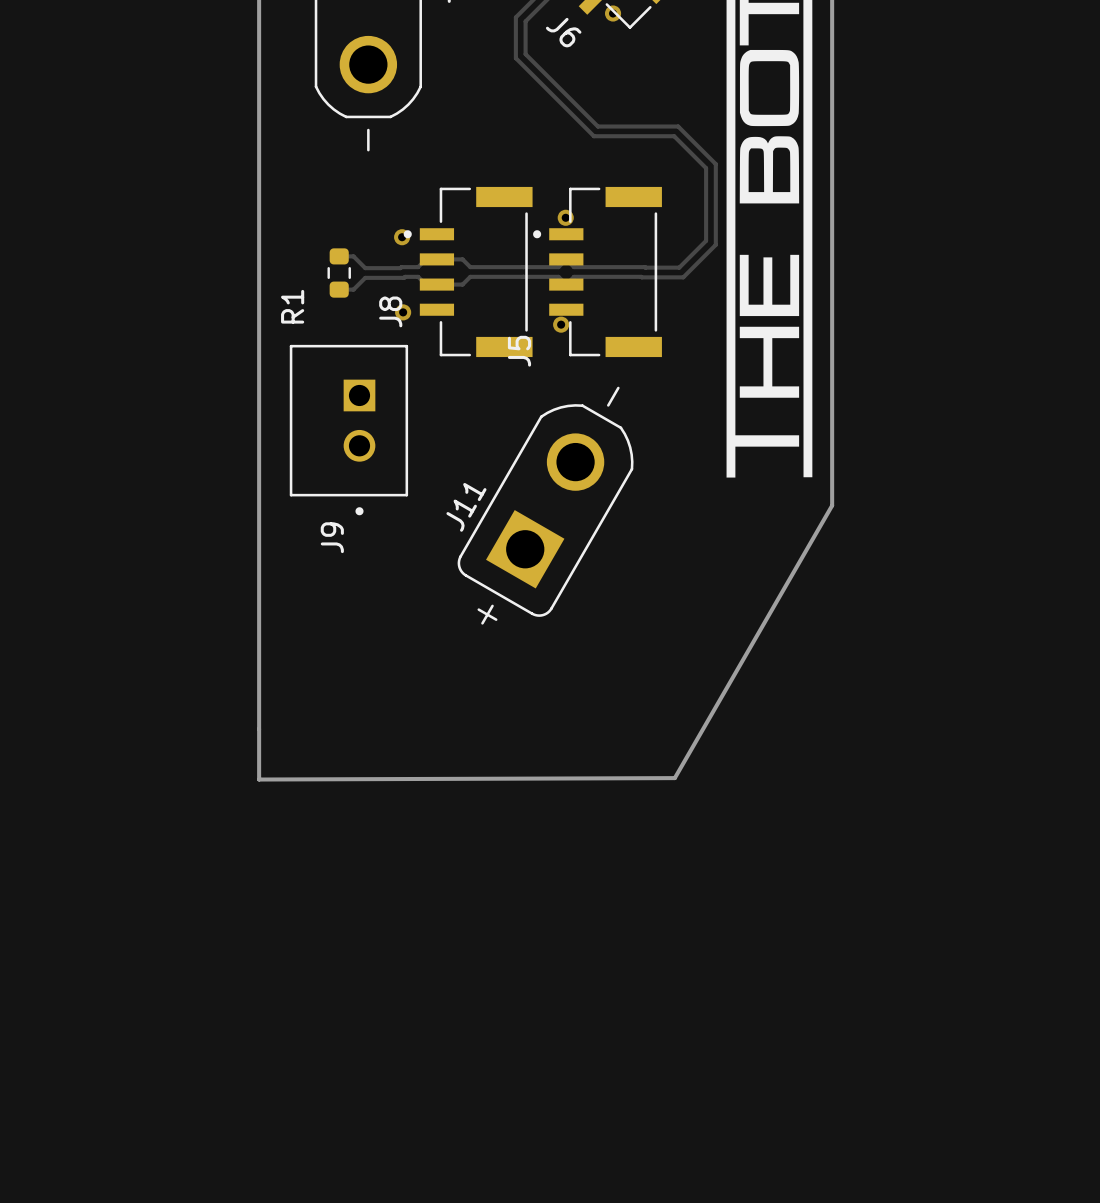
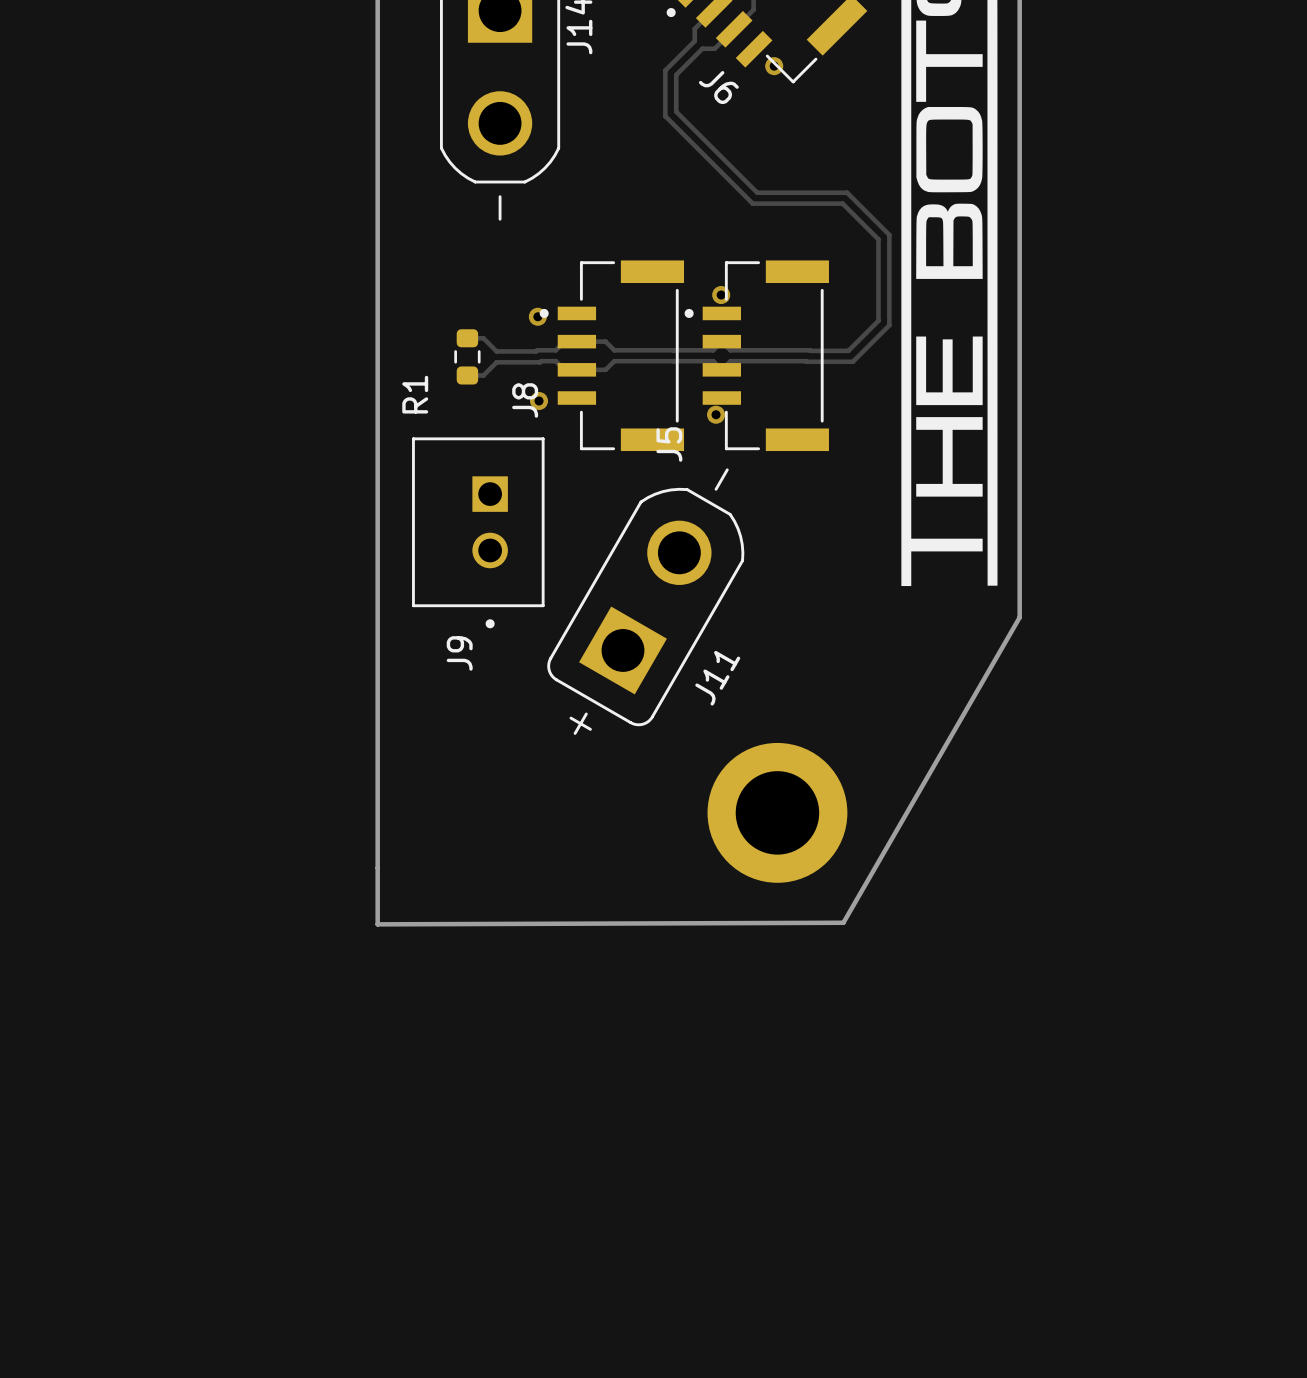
J11 position: (545, 505) -> (645, 601)
J11 name position: J11 (466, 507) -> J11 (717, 678)
part: none -> (777, 812)

